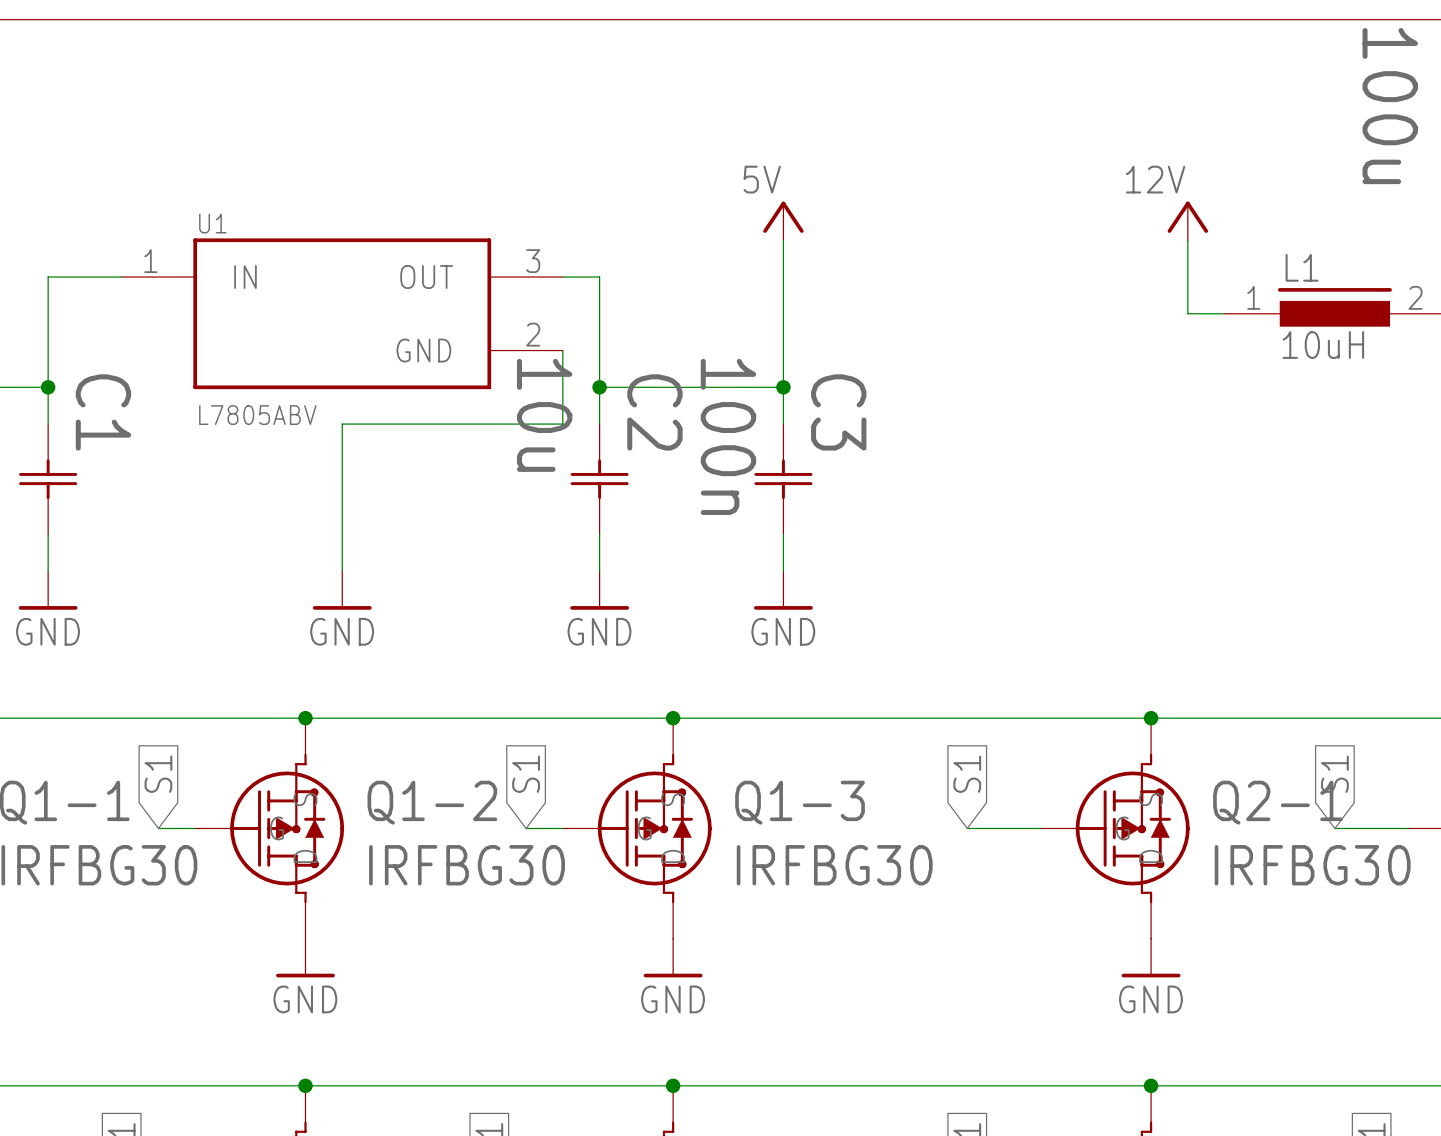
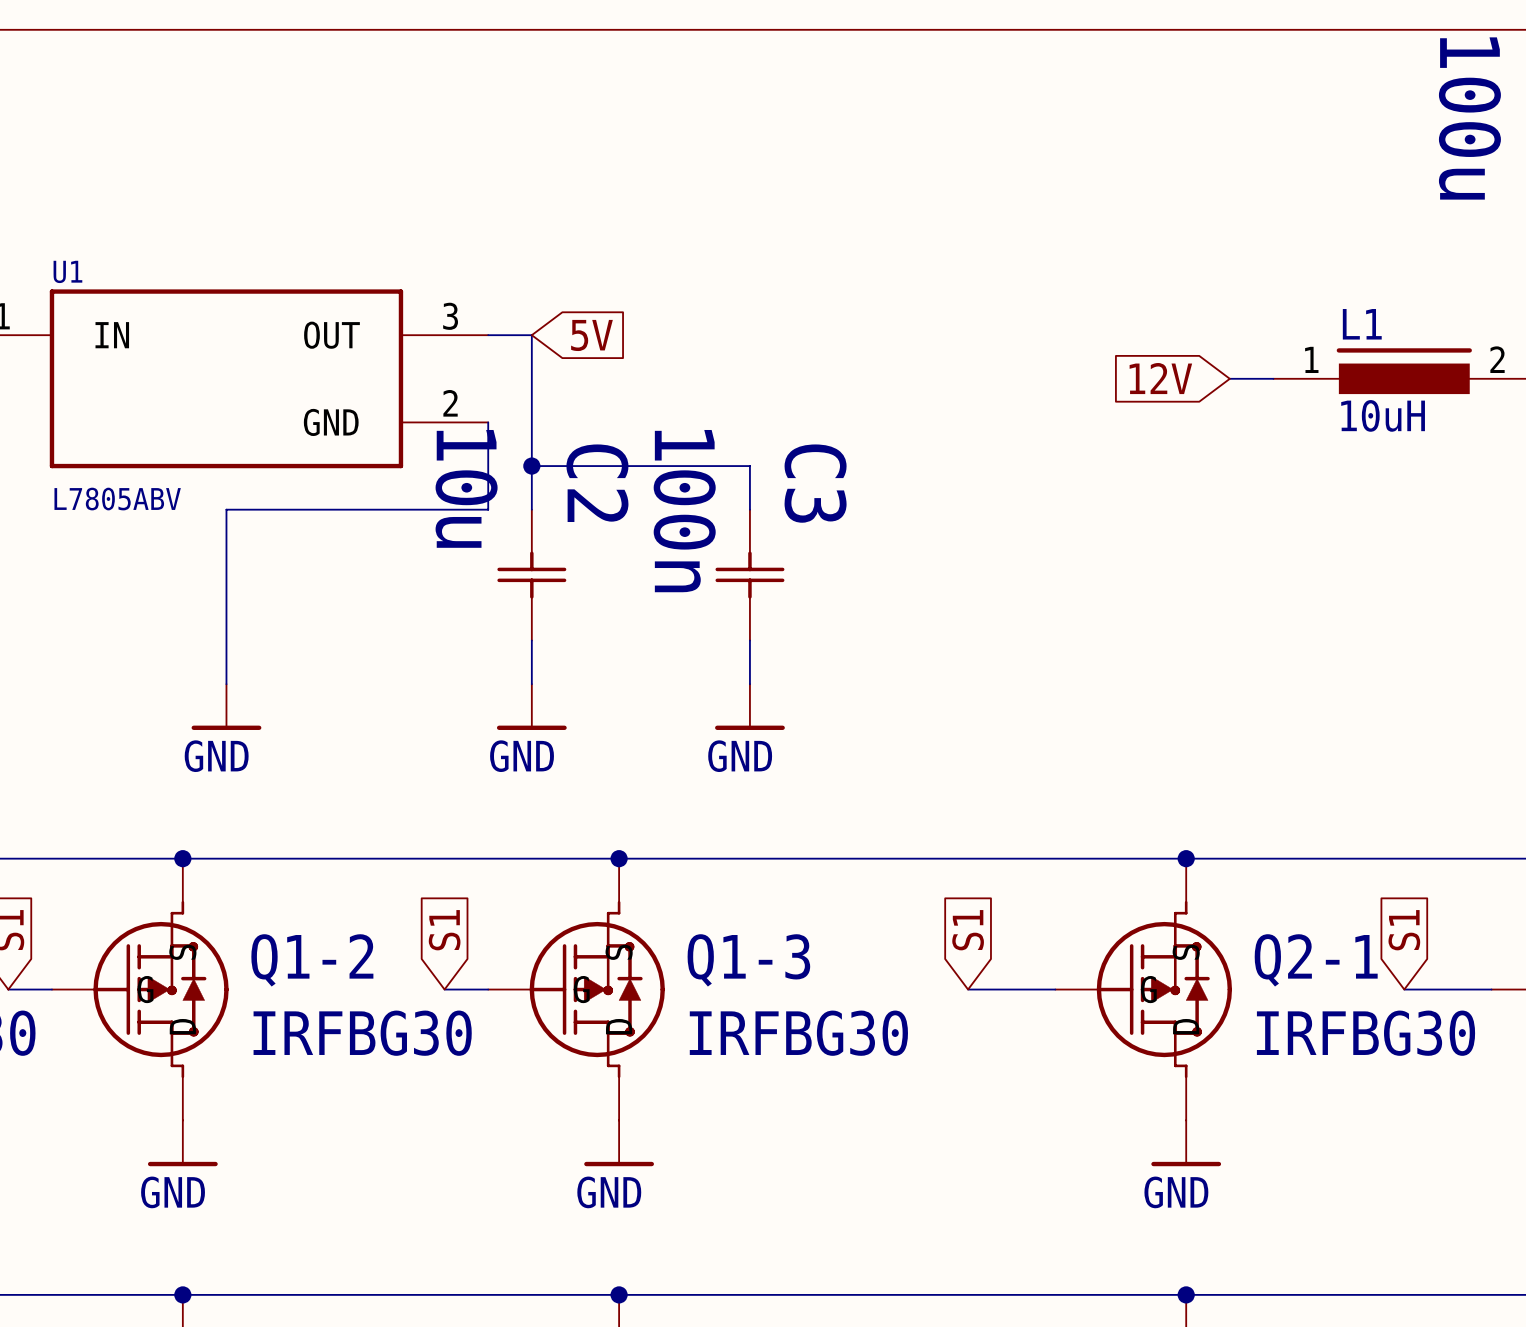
power symbol: 5V (783, 220) -> none
power symbol: 12V (1187, 220) -> none
wire: (783, 240) (783, 387) -> none
wire: (1187, 240) (1187, 313) -> none
global label: none -> 5V (591, 335)
global label: none -> 12V (1160, 378)
junction: (783, 387) -> none

